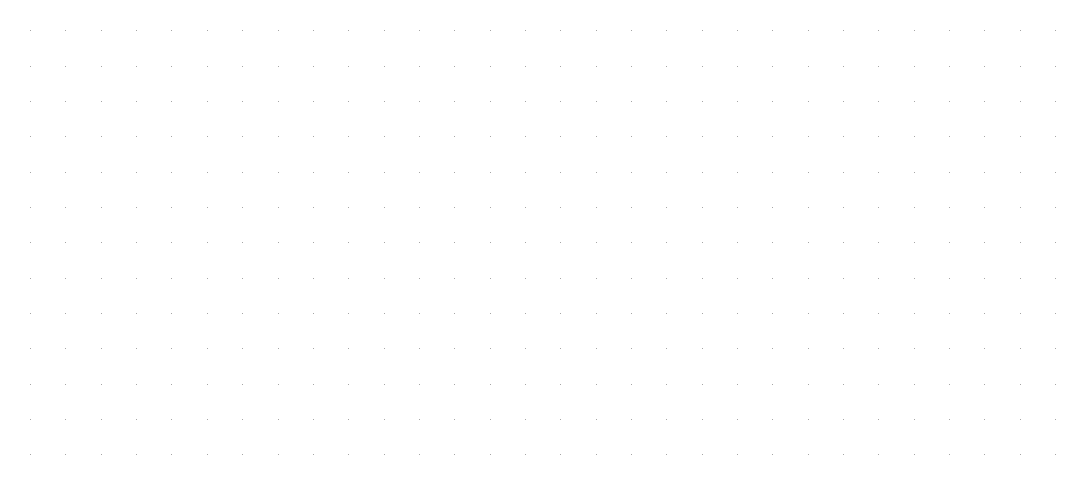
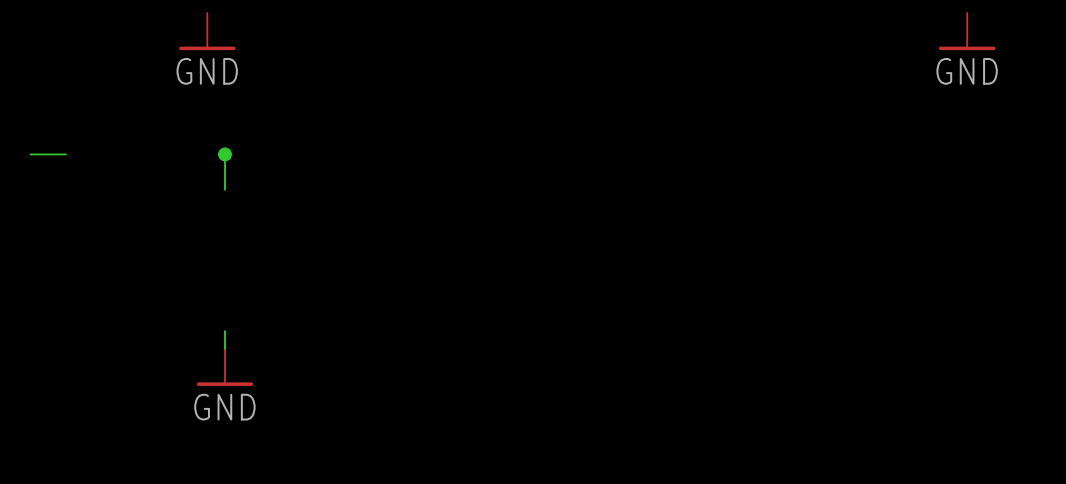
power symbol: none -> GND (207, 31)
power symbol: none -> GND (967, 31)
wire: none -> (30, 154) (65, 154)
wire: none -> (225, 154) (225, 189)
junction: none -> (225, 154)
wire: none -> (225, 331) (225, 348)
power symbol: none -> GND (225, 367)

